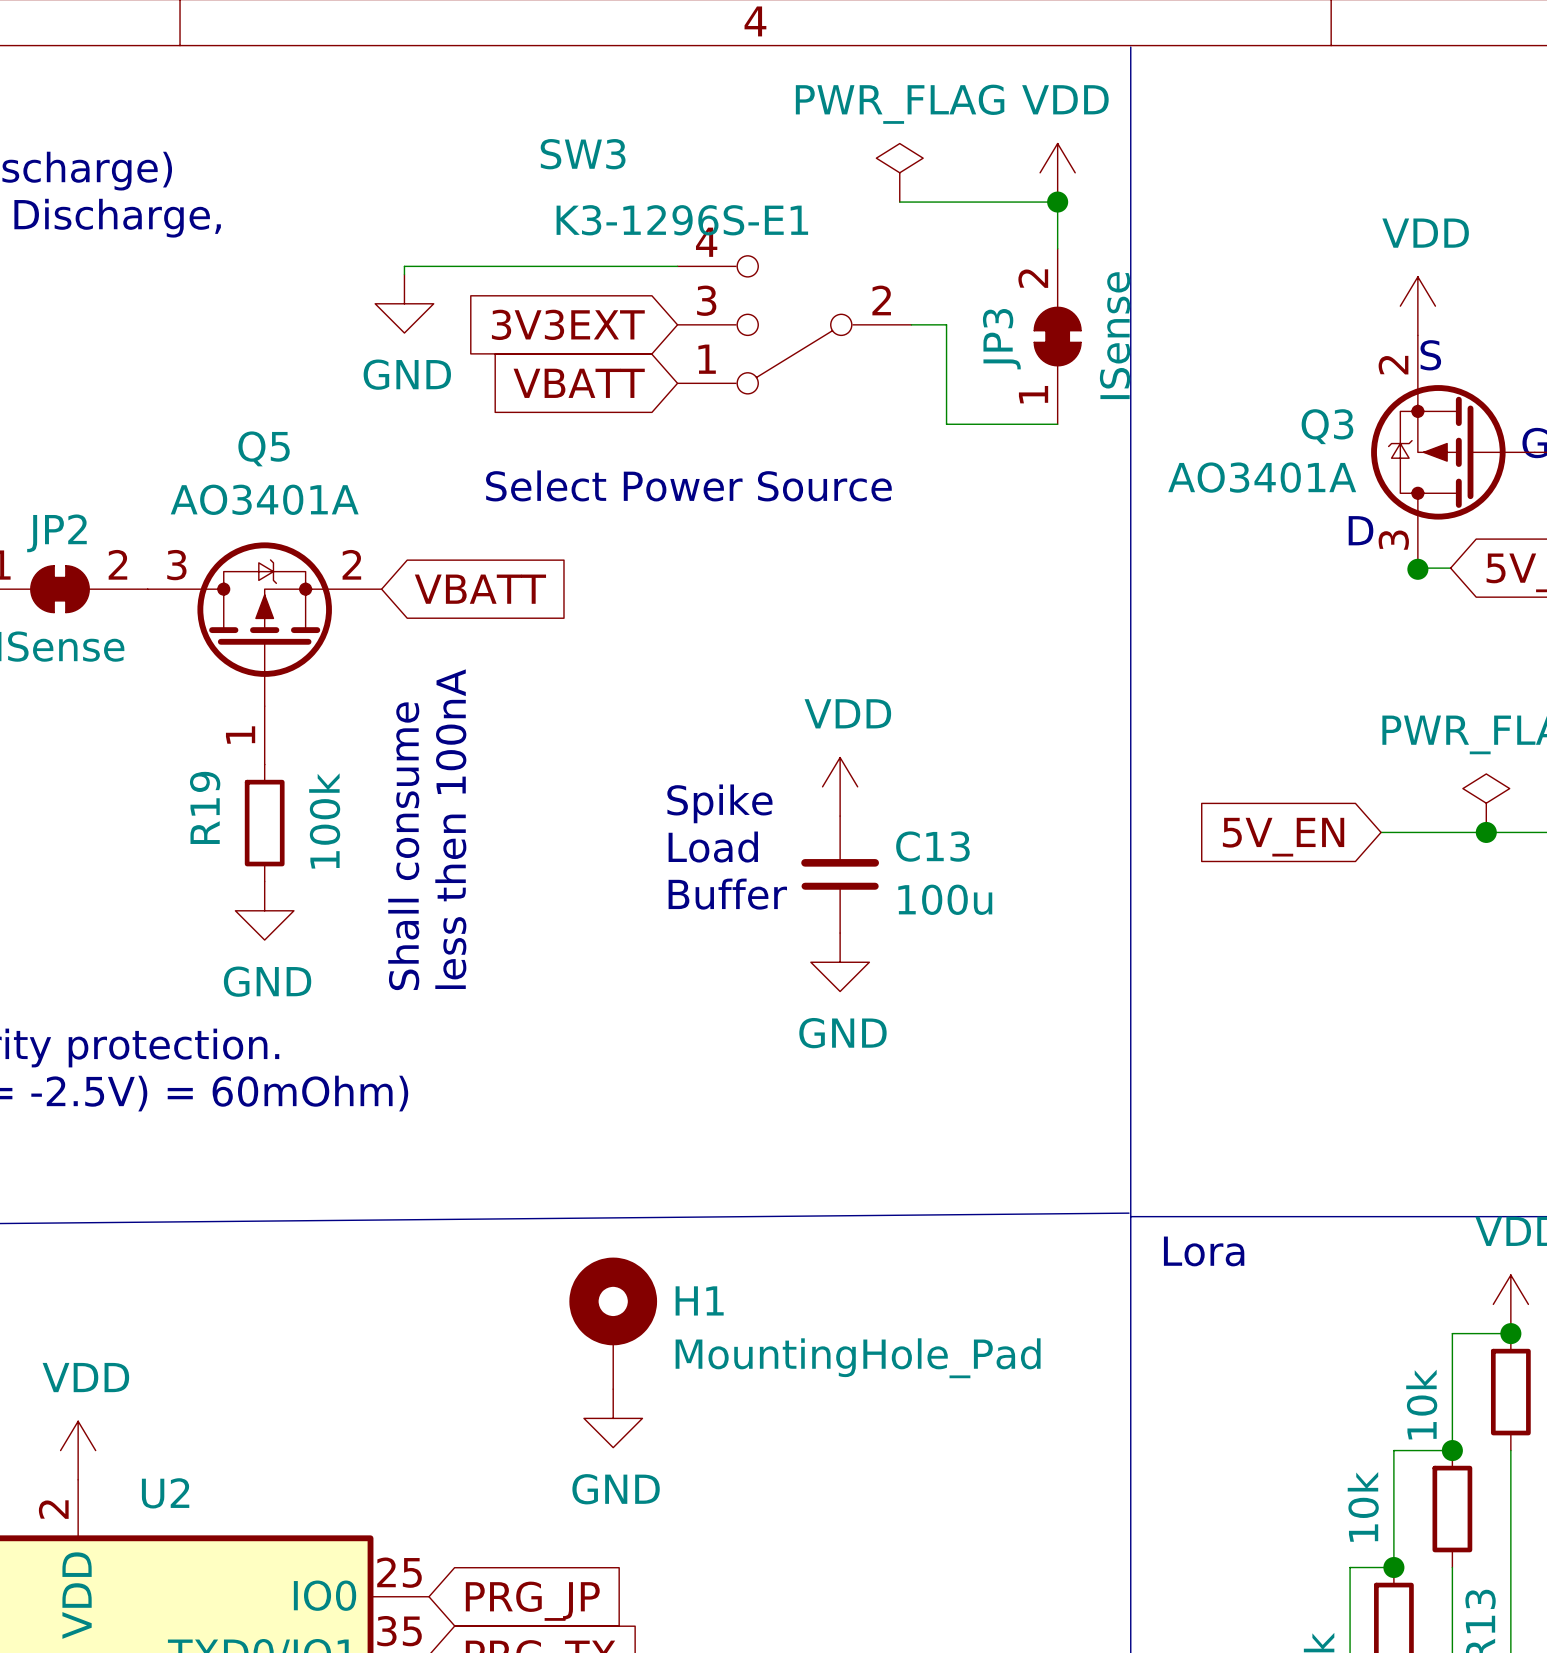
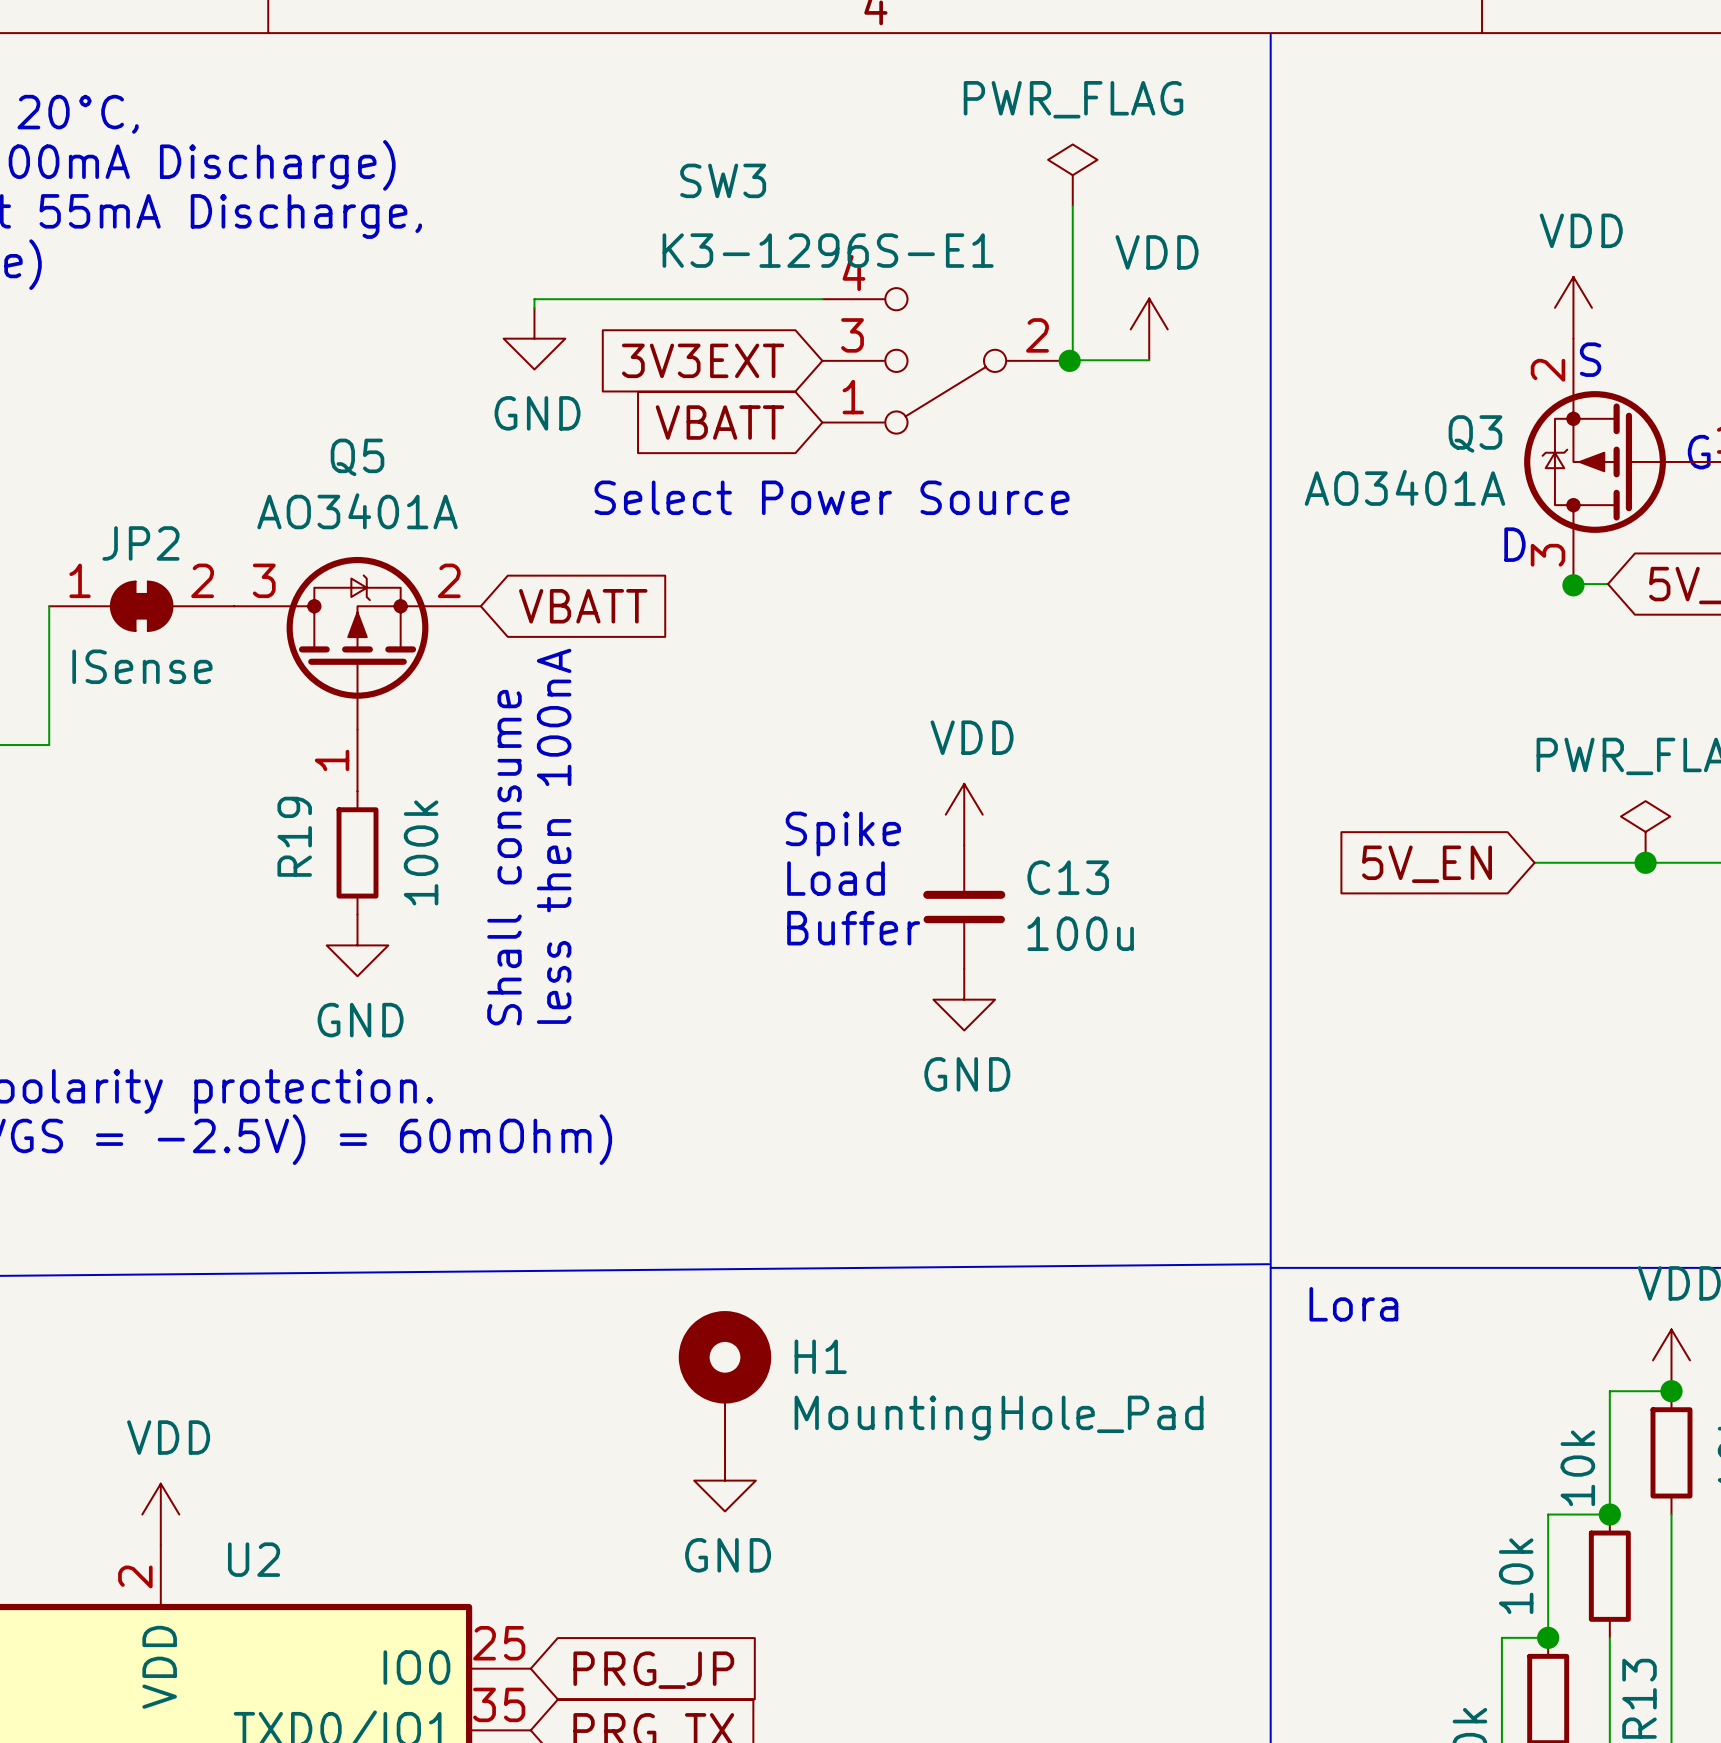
power symbol position: PWR_FLAG (899, 172) -> PWR_FLAG (1072, 175)
power symbol position: VDD (1057, 172) -> VDD (1149, 329)
wire: (899, 202) (1057, 202) (1057, 248) -> none
junction: (1057, 202) -> none
wire: none -> (1072, 206) (1072, 360) (1068, 360)
wire: (677, 266) (404, 266) (404, 274) -> (822, 299) (534, 299) (534, 307)
power symbol position: GND (404, 303) -> GND (534, 338)
global label position: 3V3EXT (568, 324) -> 3V3EXT (703, 360)
SW3 position: (794, 324) -> (945, 360)
wire: (911, 324) (946, 324) (946, 424) (1057, 424) -> none
JP3: ISense (1057, 336) -> none
wire: none -> (1149, 360) (1069, 360)
junction: none -> (1069, 360)
global label position: VBATT (579, 383) -> VBATT (719, 422)

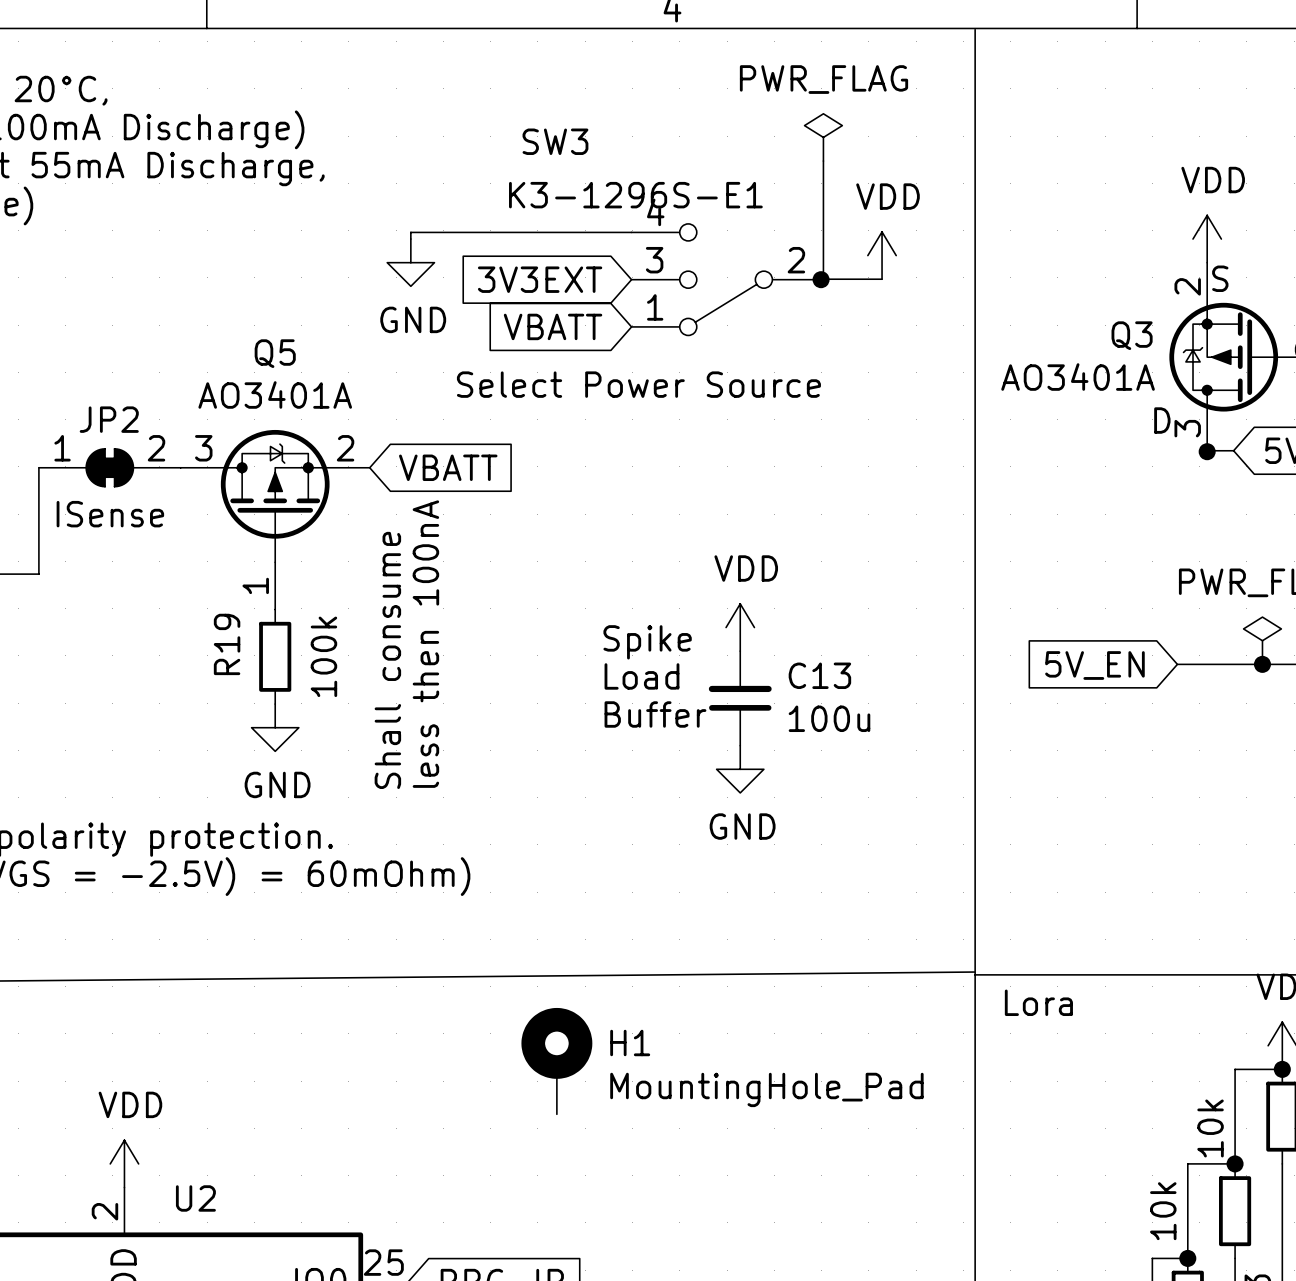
power symbol: GND (725, 1480) -> none

